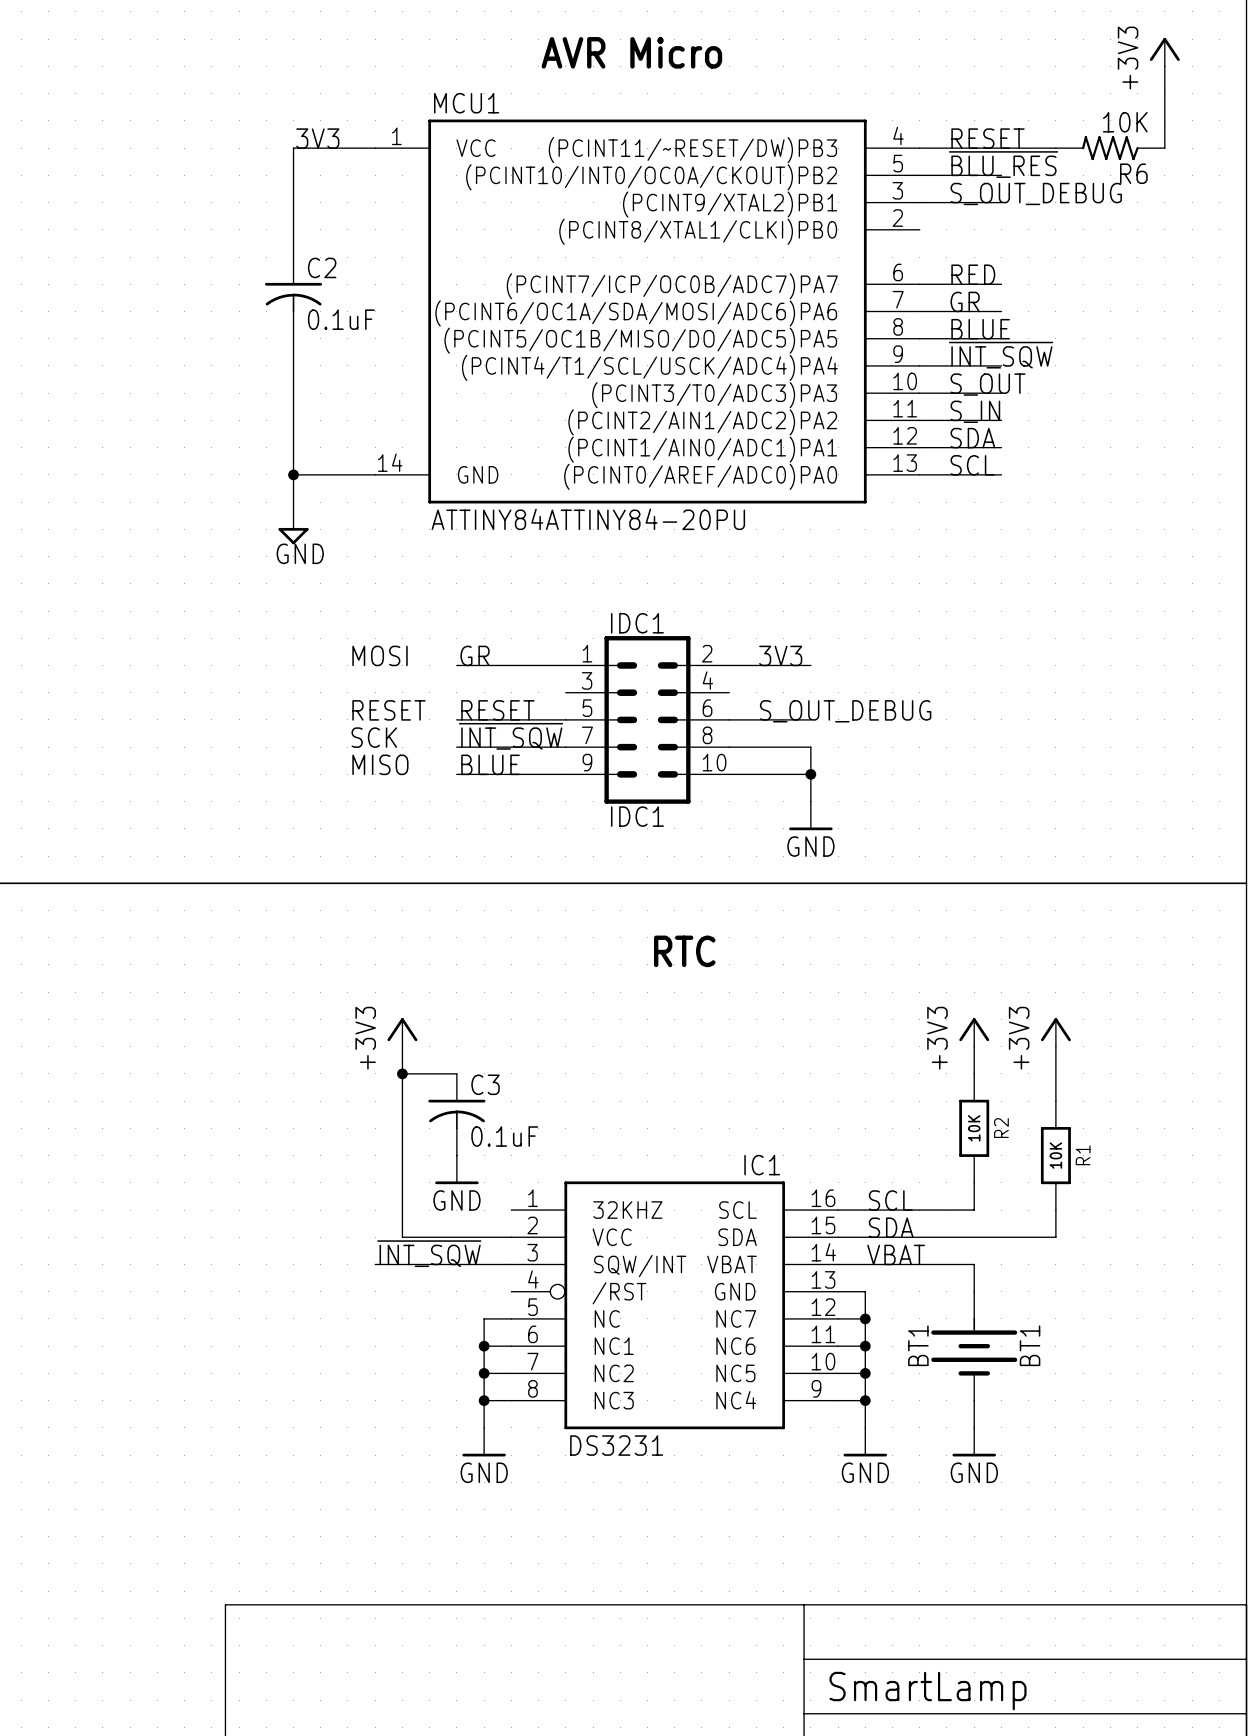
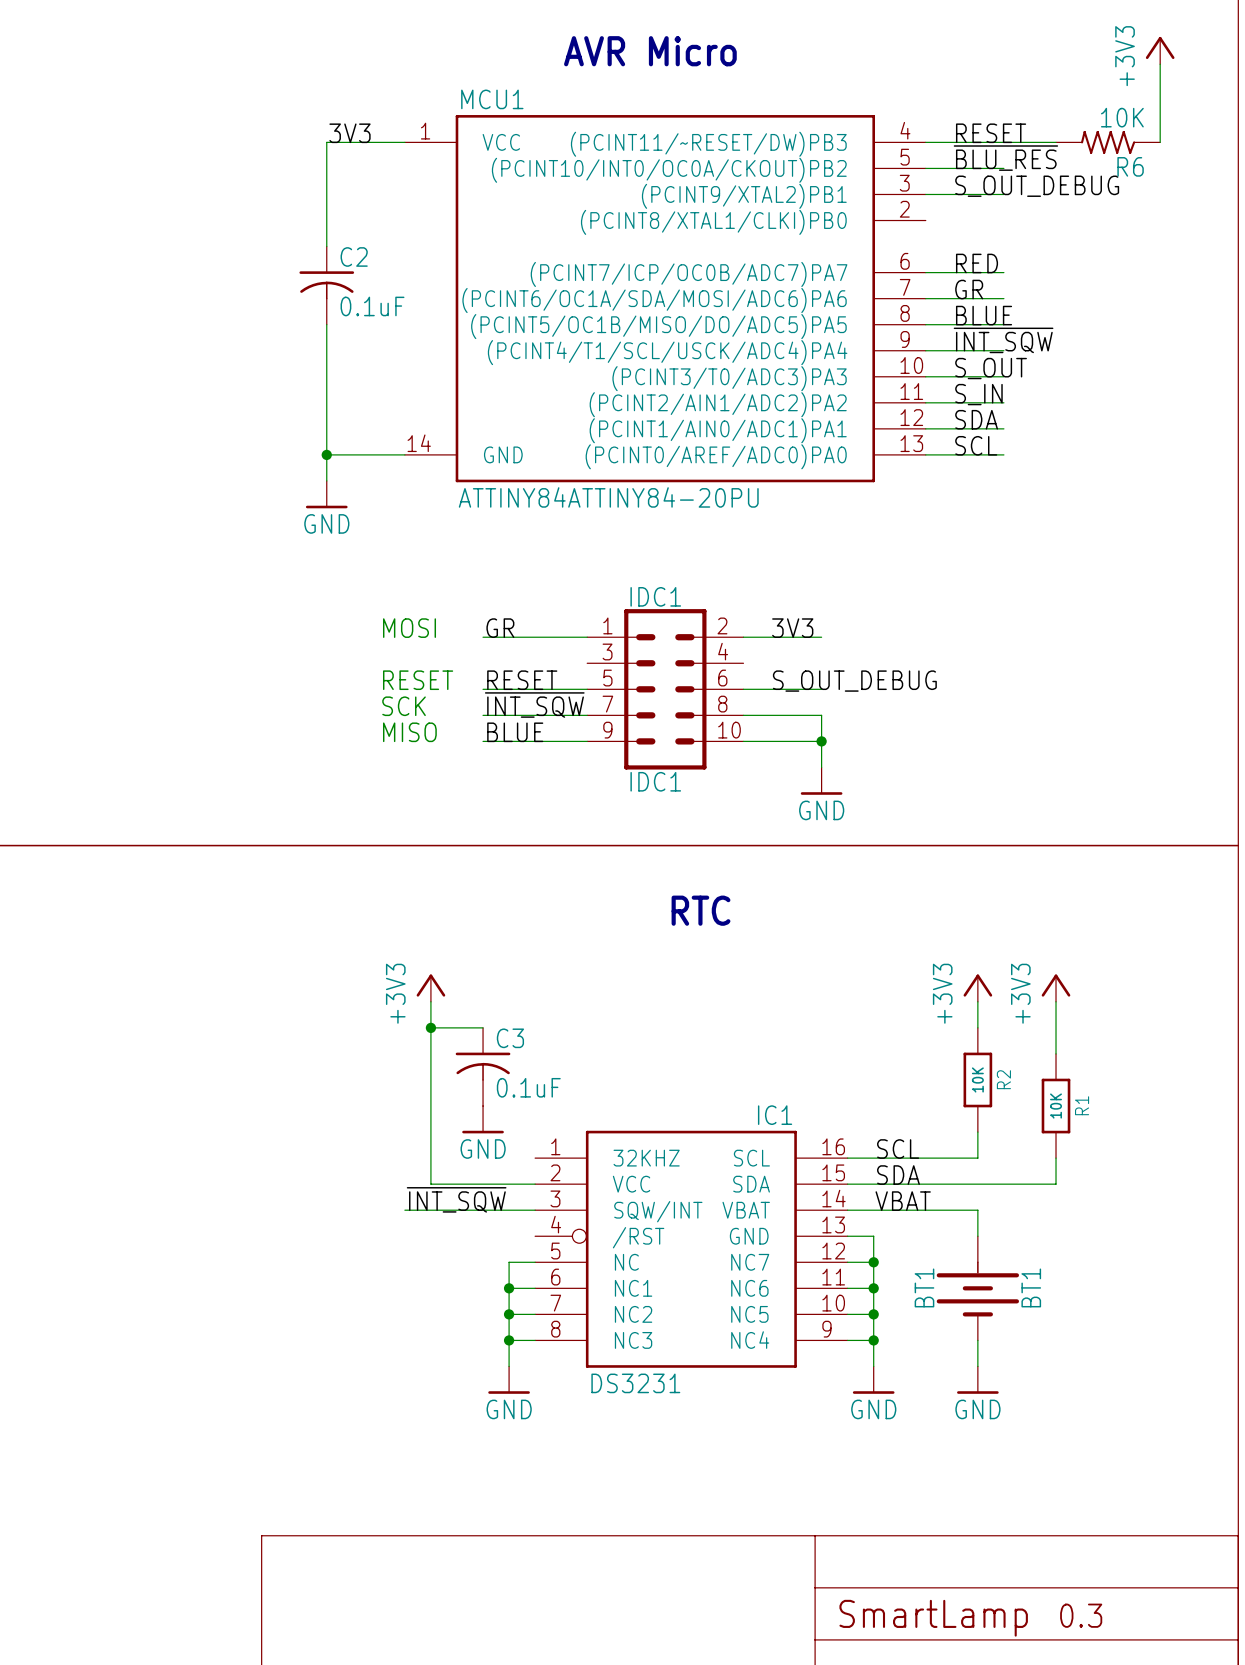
power symbol shape: [278, 502, 309, 545] -> [305, 480, 348, 509]
text: none -> 0.3 (1081, 1615)

